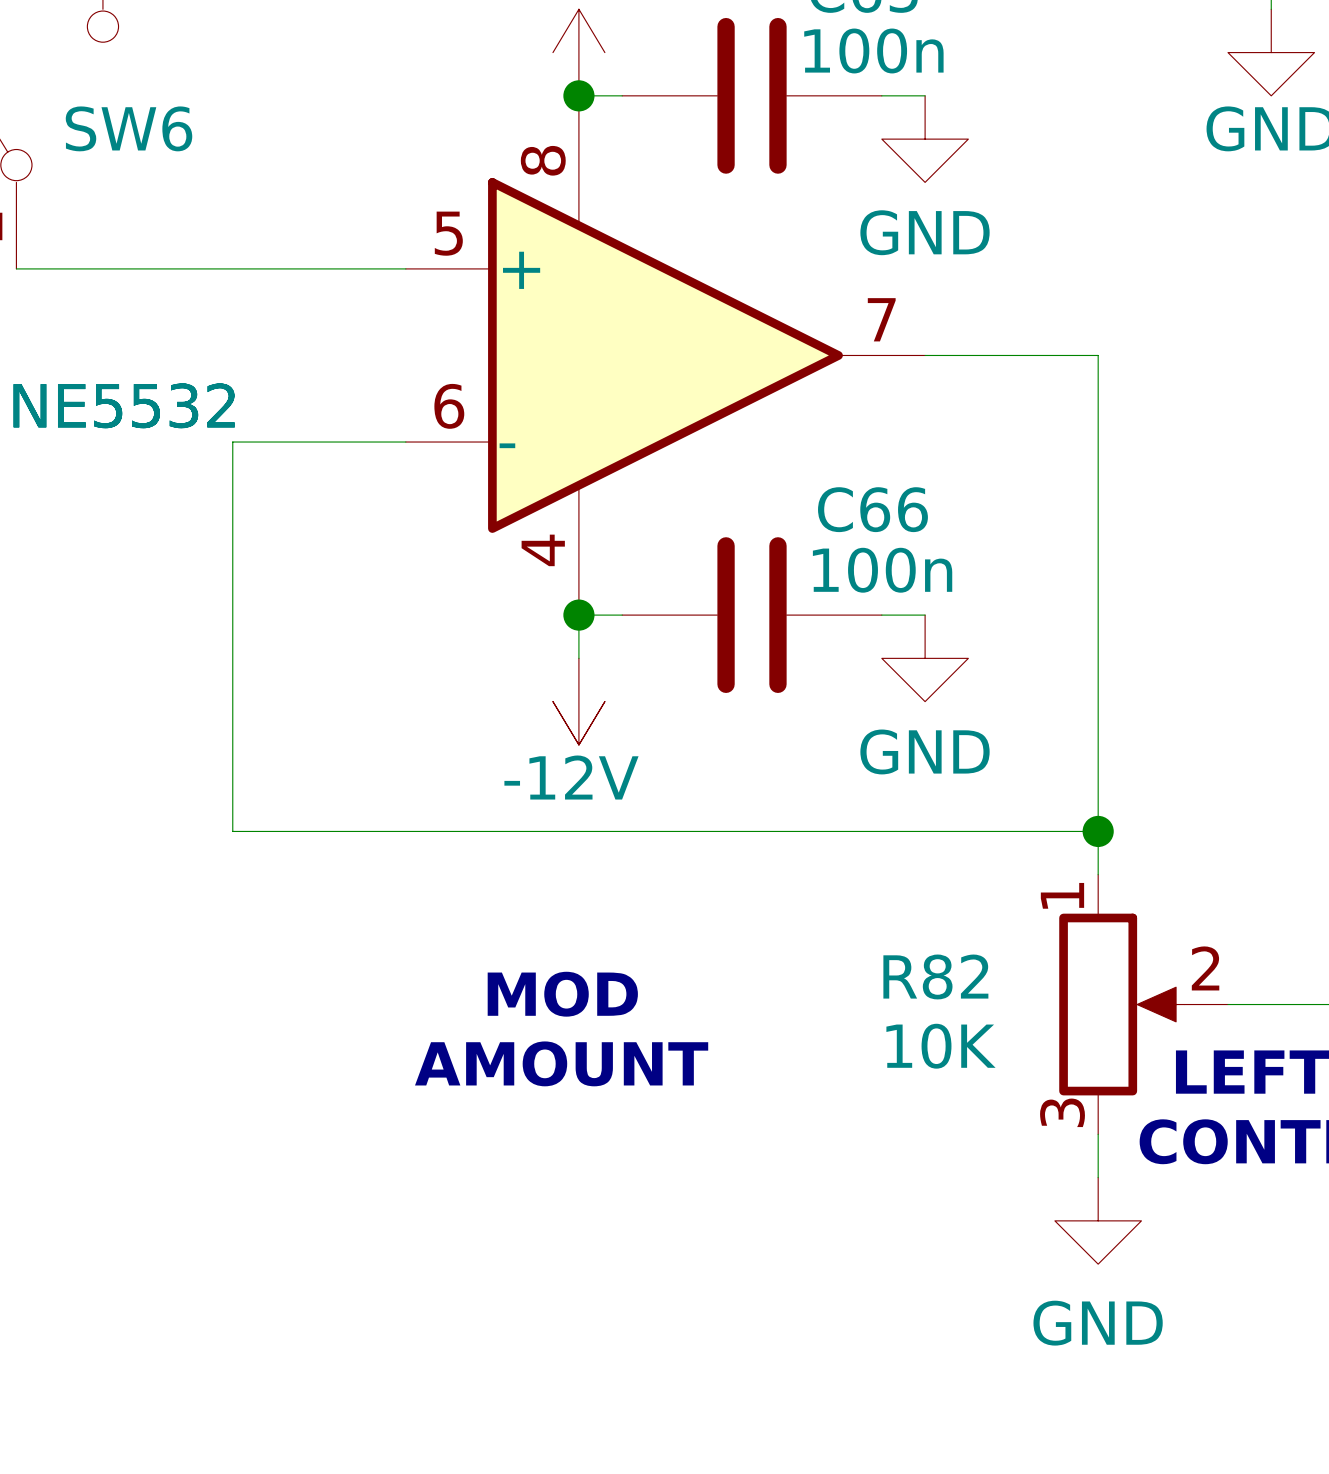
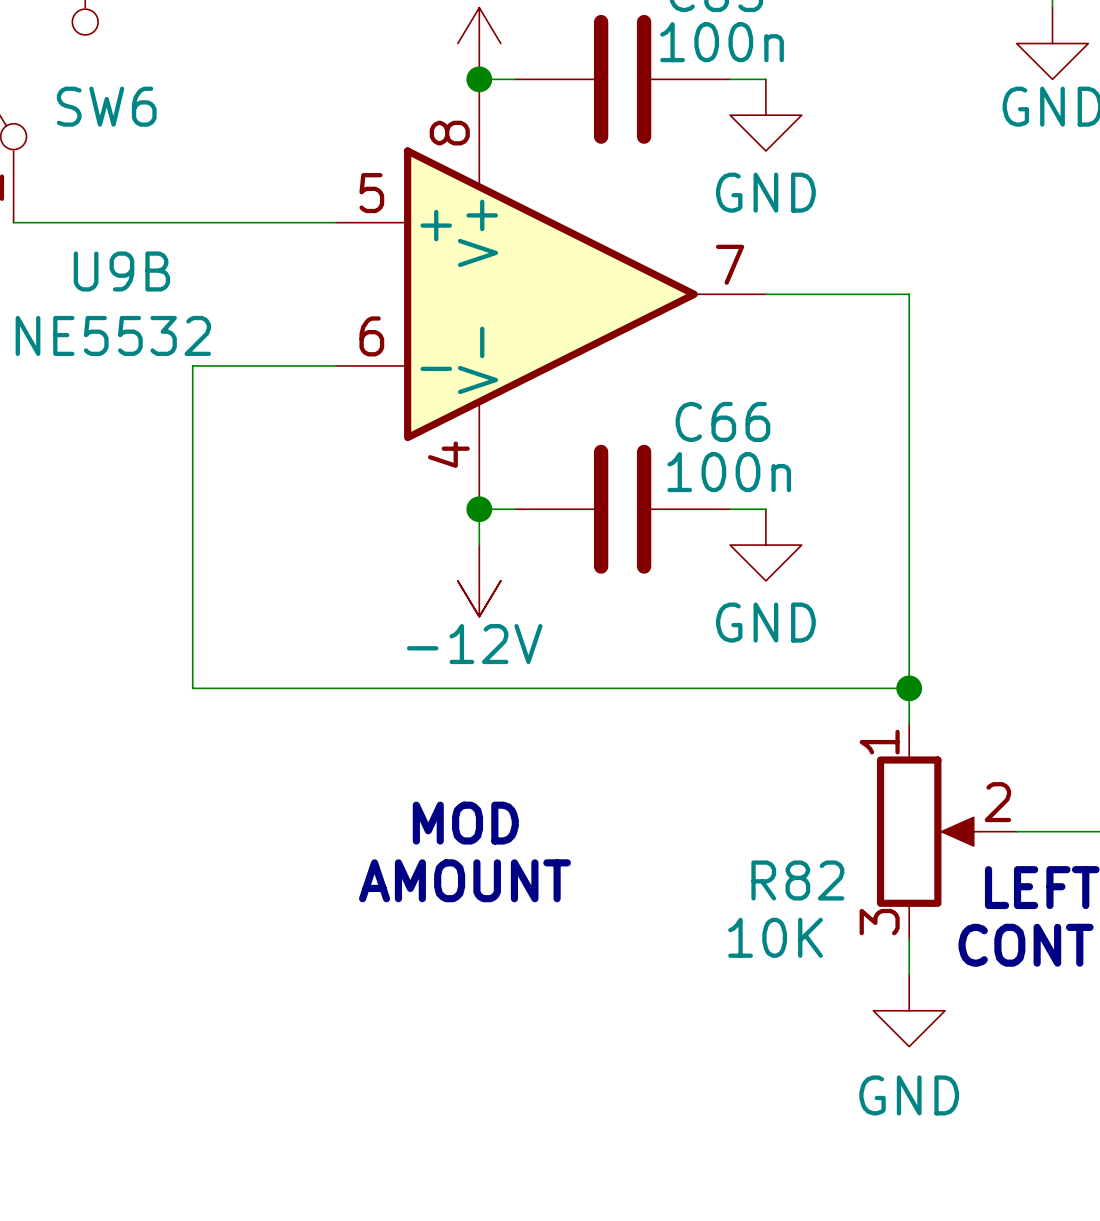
part pin name: none -> V+ (477, 233)
U9B name: none -> U9B (121, 271)
U9B value: NE5532 (124, 405) -> none
part pin name: none -> V- (477, 360)
R82 name position: R82 (935, 976) -> R82 (797, 880)
R82 value position: 10K (940, 1046) -> 10K (775, 937)

